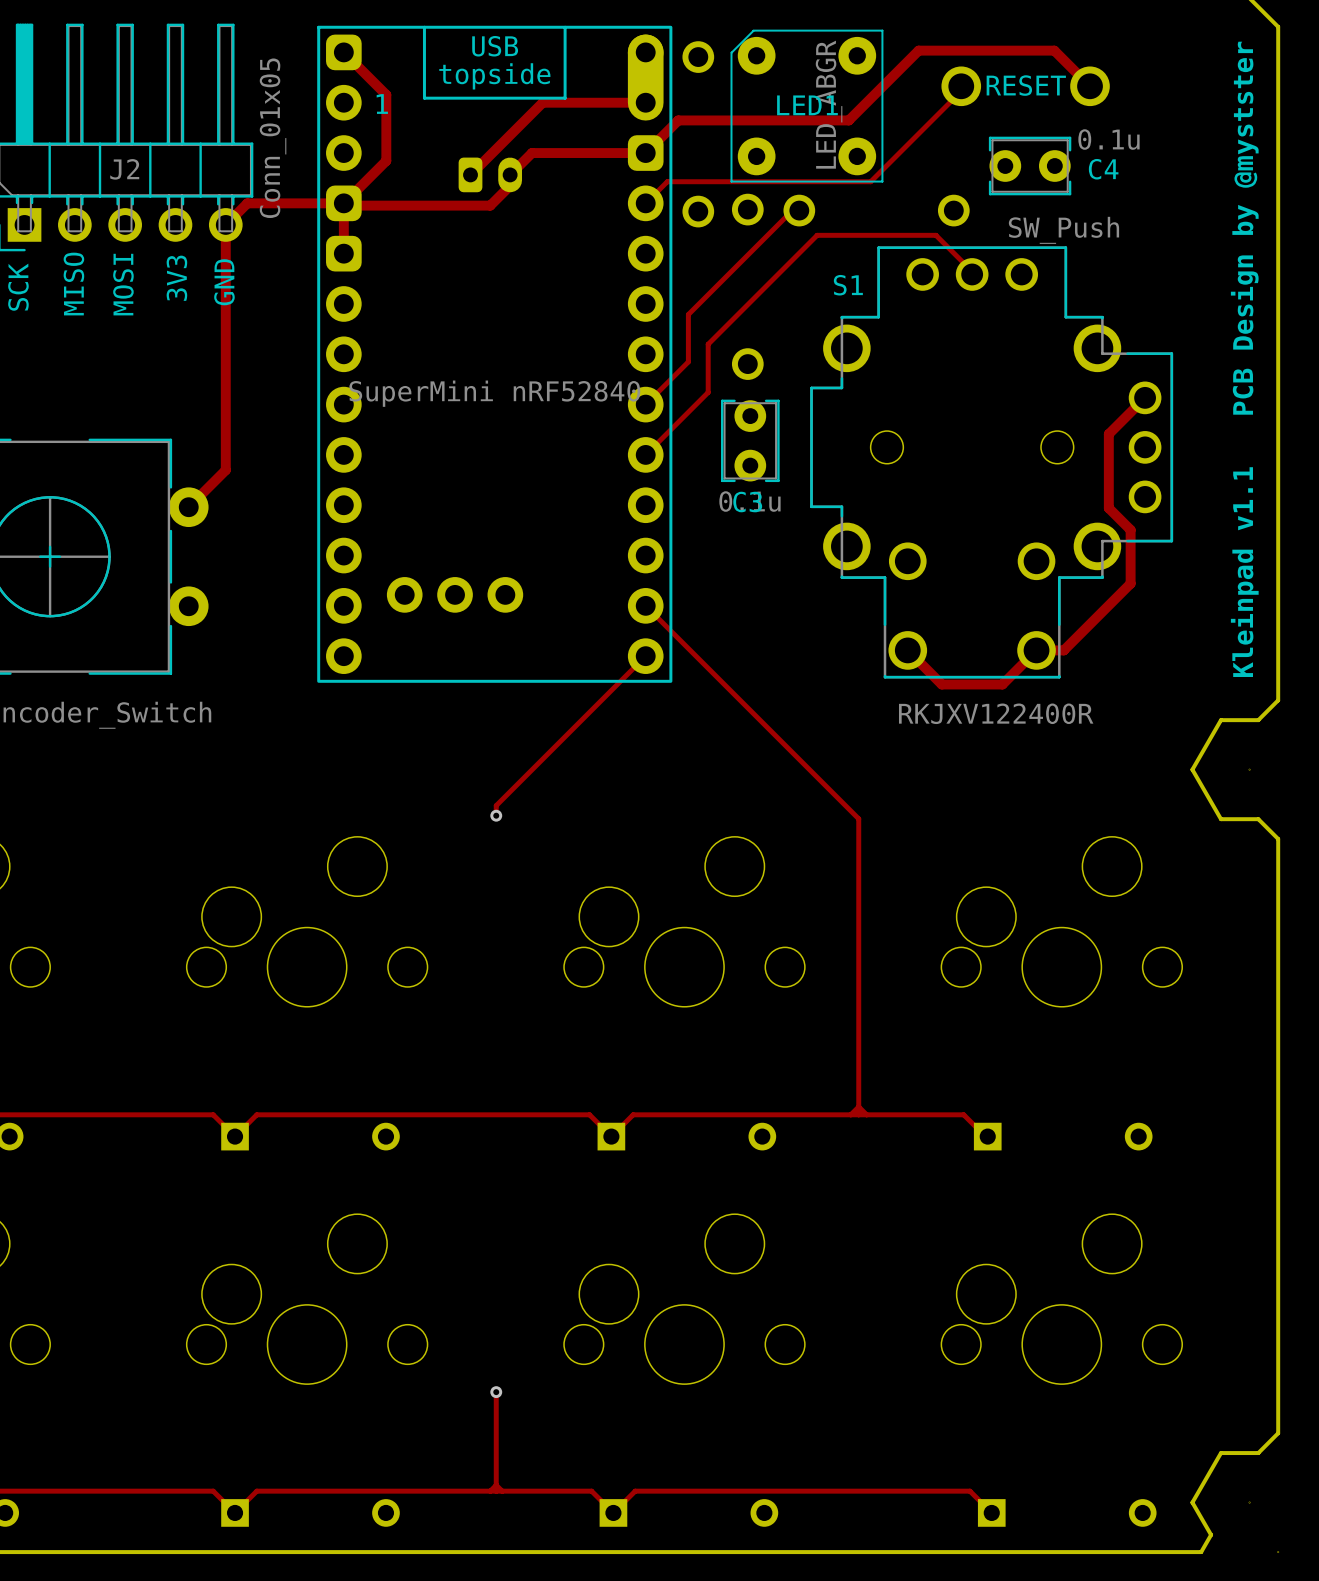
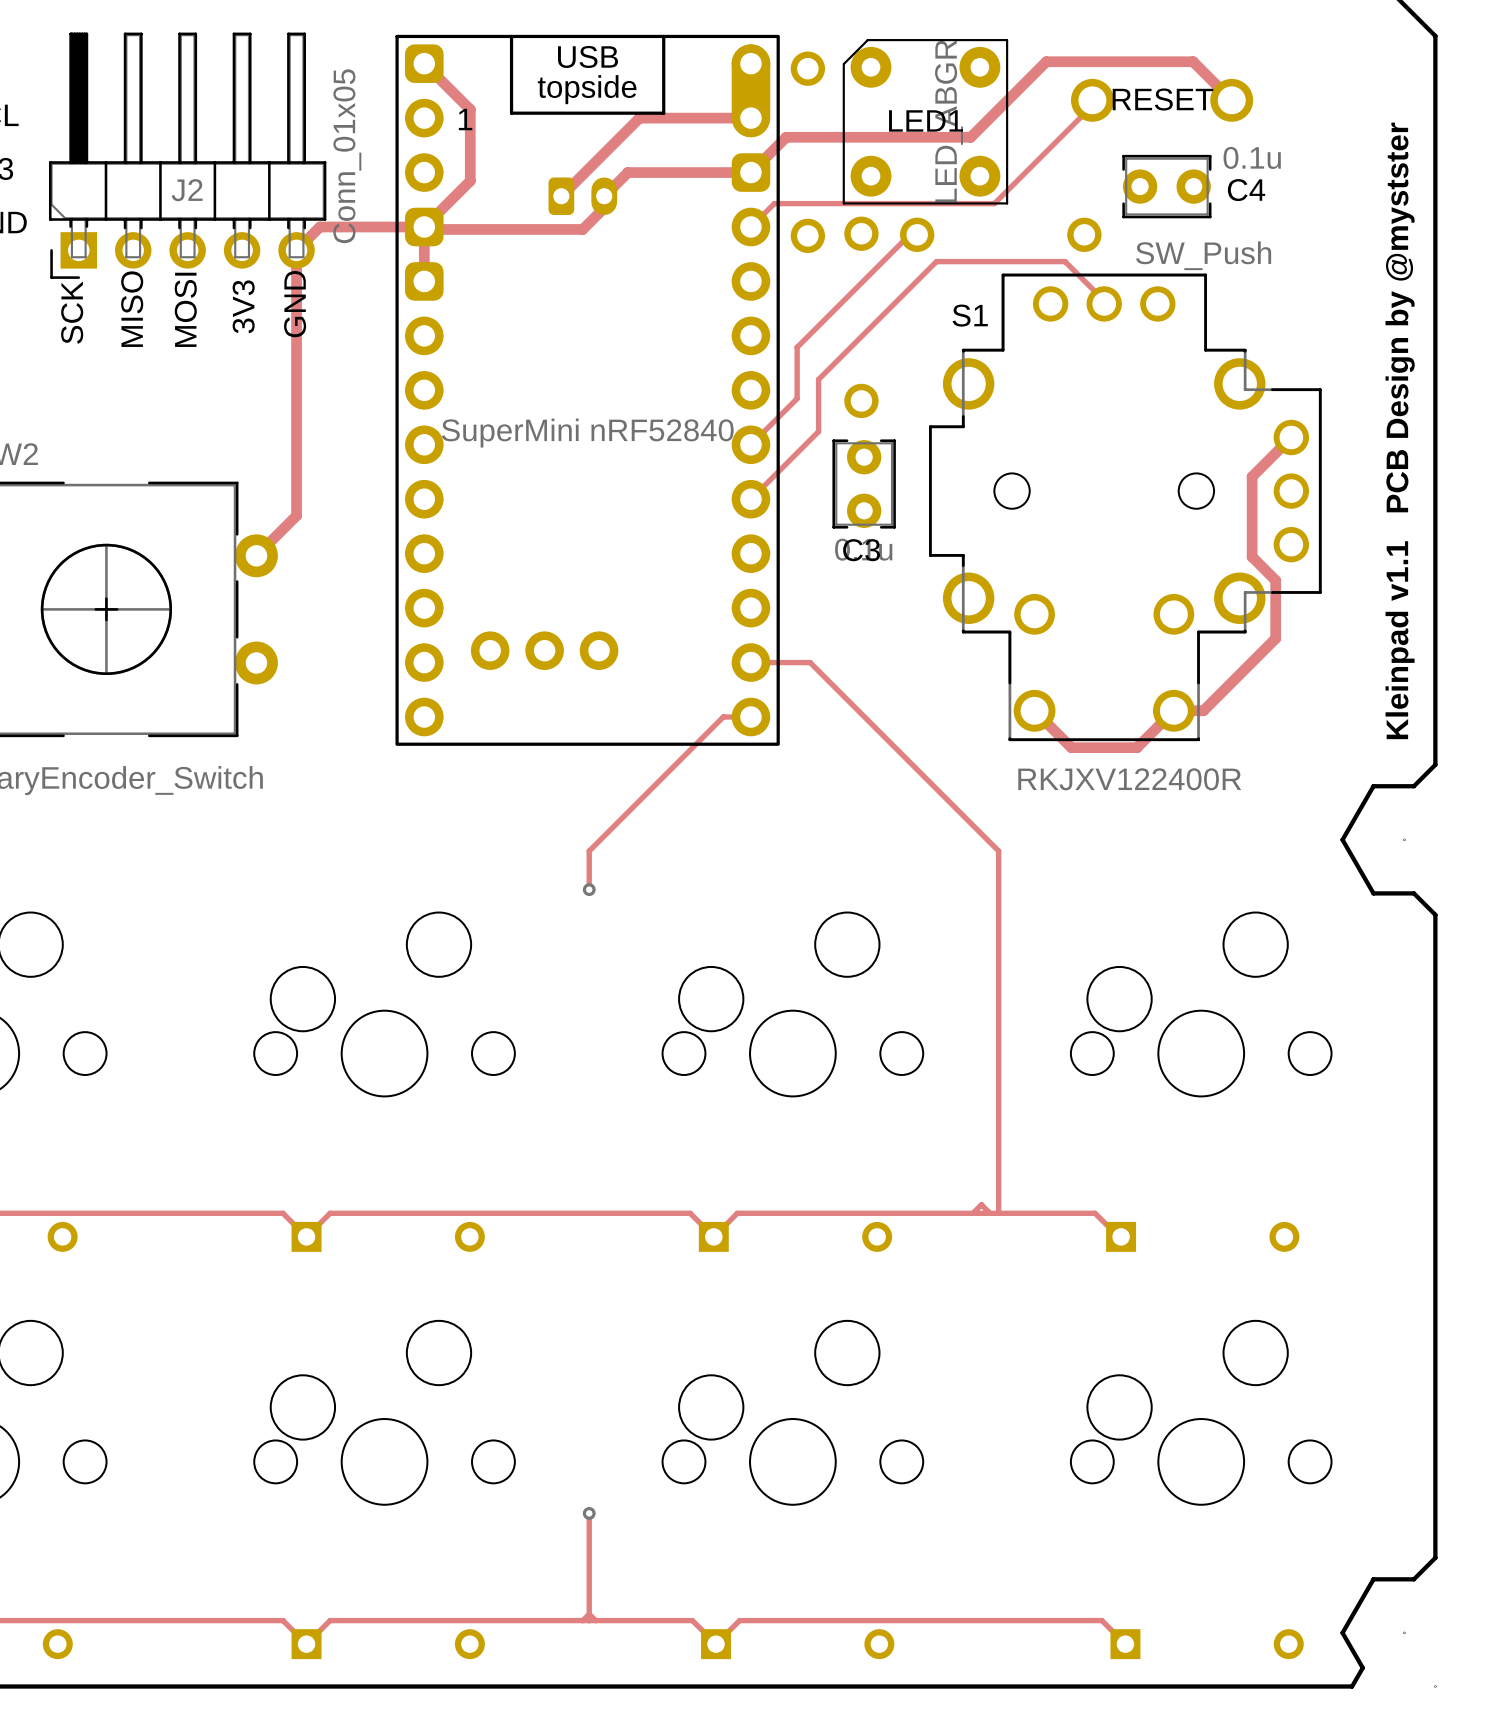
track: (645, 605) (858, 818) (858, 1114) -> (750, 662) (810, 662) (998, 851) (998, 1213)
track: (645, 656) (496, 805) -> (750, 717) (723, 717) (589, 851) (589, 878)

